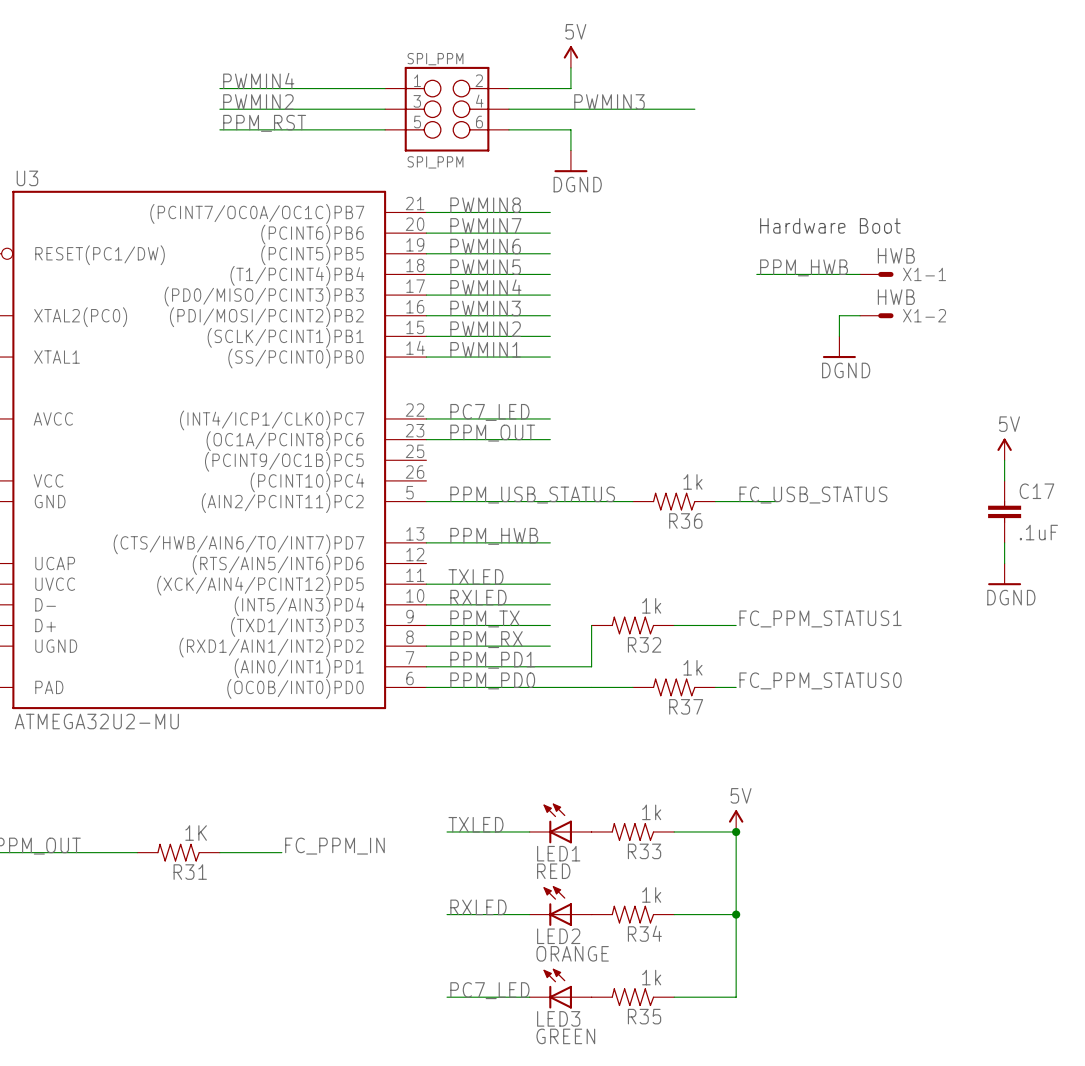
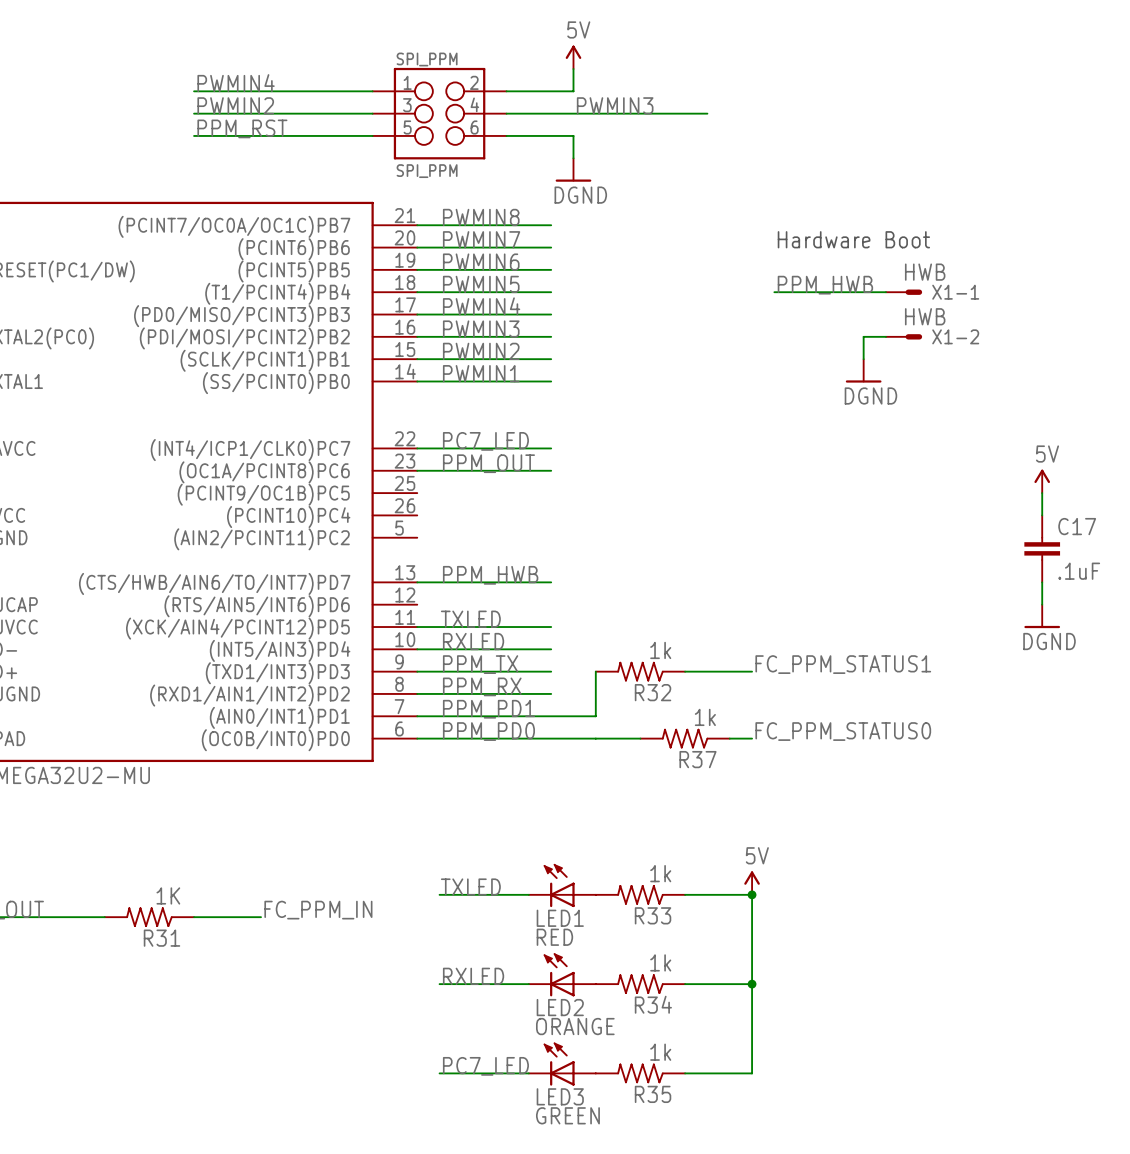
label: PPM_USB_STATUS (532, 495) -> none
label: FC_USB_STATUS (813, 495) -> none
wire: (426, 501) (632, 501) -> none
R36: 1k (674, 501) -> none
wire: (715, 501) (777, 501) -> none

